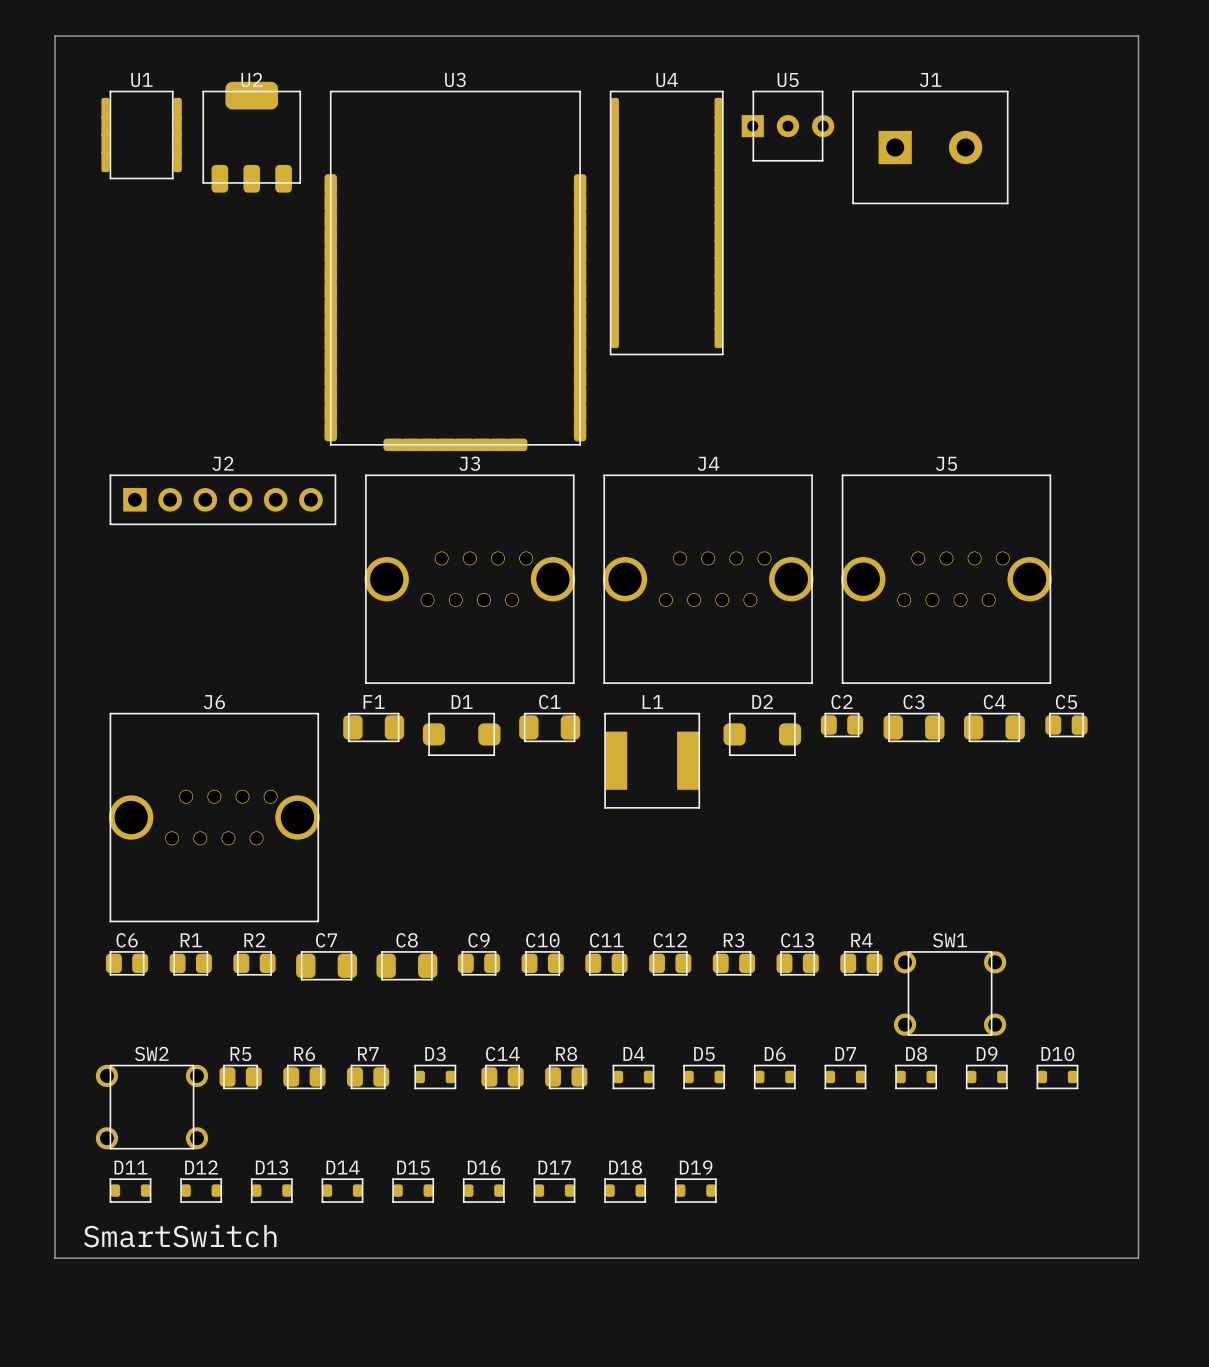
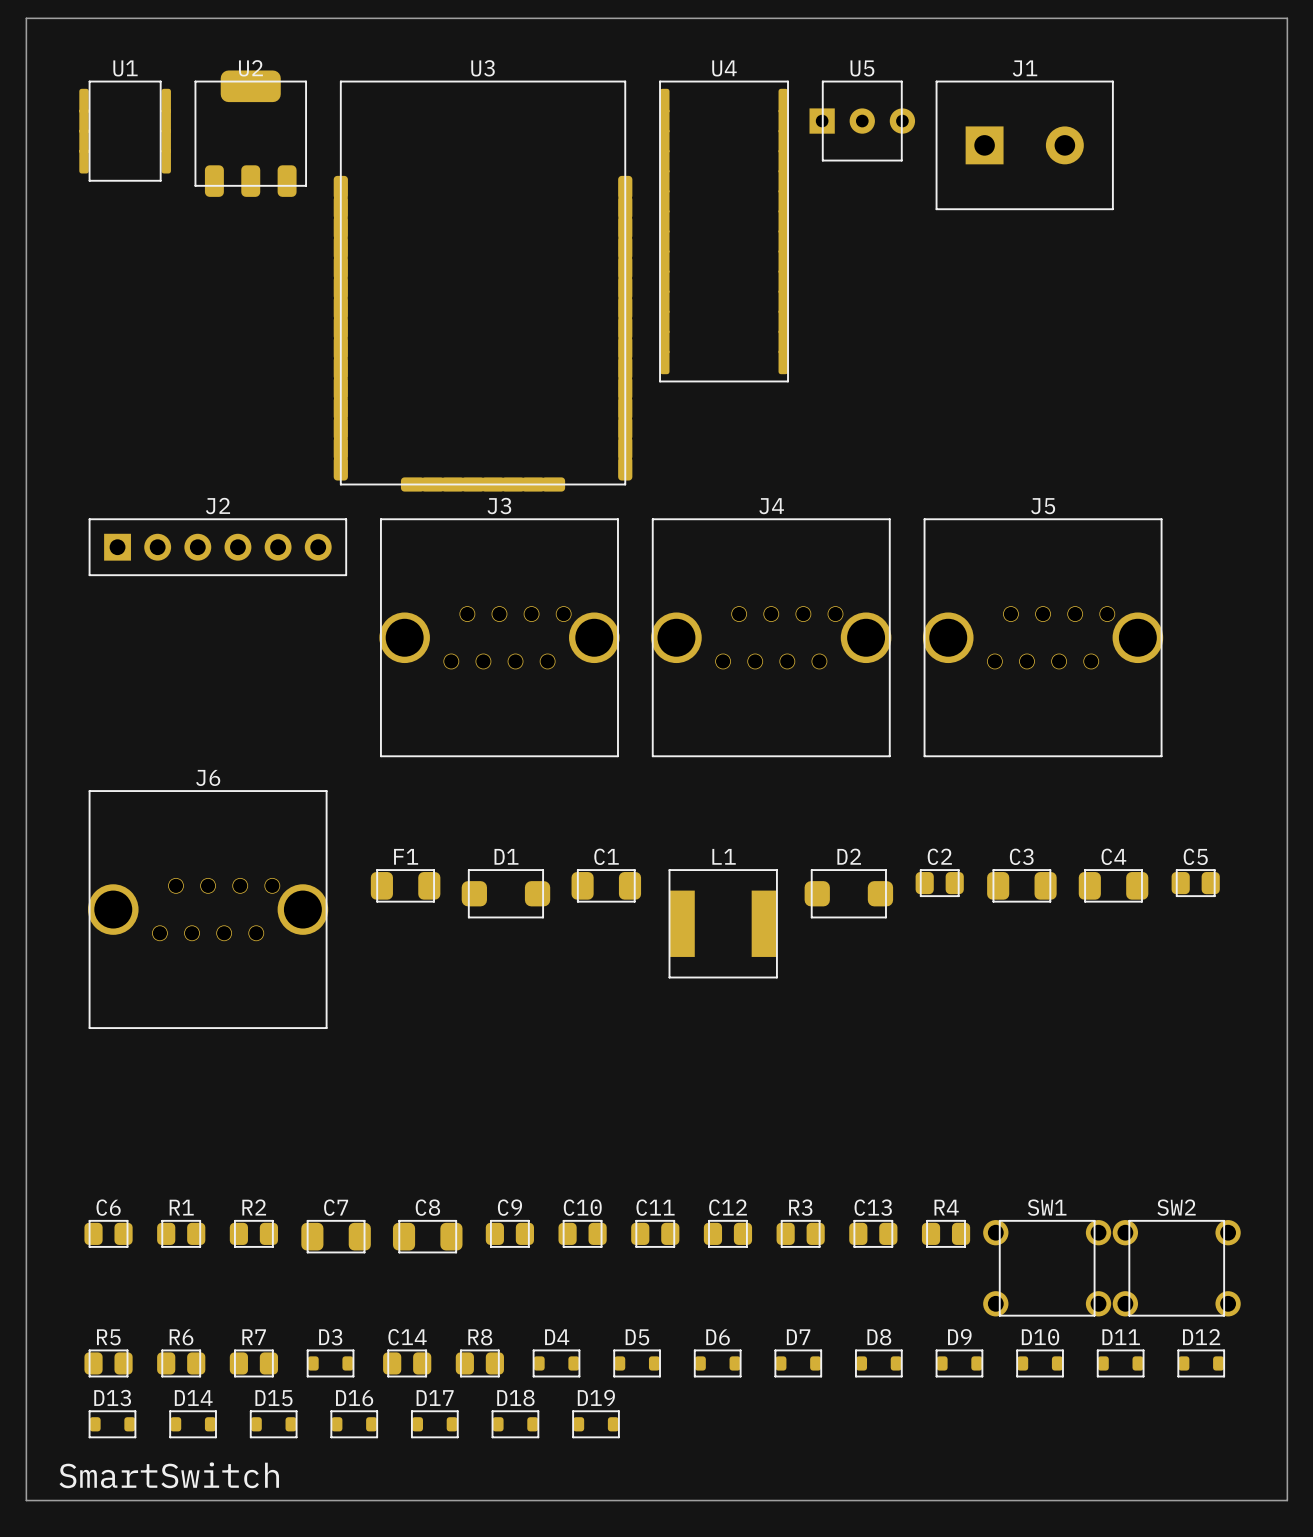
board edge: (1138, 36) (1138, 1258) (54, 1258) -> (1262, 18) (1287, 18) (1287, 1500) (26, 1500) (26, 1412)
C2 position: (841, 725) -> (939, 883)
C5 position: (1066, 725) -> (1195, 883)
F1 position: (373, 727) -> (405, 885)
C1 position: (549, 727) -> (606, 885)
C3 position: (914, 727) -> (1021, 885)
C4 position: (994, 727) -> (1113, 885)
D1 position: (461, 734) -> (505, 893)
D2 position: (762, 734) -> (848, 893)
L1 position: (652, 760) -> (723, 923)
C6 position: (127, 963) -> (108, 1233)
R1 position: (190, 963) -> (181, 1233)
R2 position: (254, 963) -> (253, 1233)
C9 position: (478, 963) -> (509, 1233)
C10 position: (542, 963) -> (582, 1233)
C11 position: (606, 963) -> (655, 1233)
C12 position: (670, 963) -> (727, 1233)
R3 position: (733, 963) -> (800, 1233)
C13 position: (797, 963) -> (873, 1233)
R4 position: (861, 963) -> (946, 1233)
C7 position: (326, 965) -> (336, 1236)
C8 position: (406, 965) -> (427, 1236)
SW1 position: (950, 993) -> (1047, 1268)
R5 position: (240, 1076) -> (108, 1363)
R6 position: (304, 1076) -> (181, 1363)
R7 position: (368, 1076) -> (253, 1363)
D3 position: (435, 1076) -> (330, 1363)
C14 position: (502, 1076) -> (407, 1363)
R8 position: (566, 1076) -> (479, 1363)
D4 position: (633, 1076) -> (556, 1363)
D5 position: (704, 1076) -> (637, 1363)
D6 position: (774, 1076) -> (717, 1363)
D7 position: (845, 1076) -> (798, 1363)
D8 position: (916, 1076) -> (878, 1363)
D9 position: (986, 1076) -> (959, 1363)
D10 position: (1057, 1076) -> (1040, 1363)
SW2 position: (151, 1107) -> (1176, 1268)
D11 position: (130, 1190) -> (1120, 1363)
D12 position: (201, 1190) -> (1201, 1363)
D13 position: (271, 1190) -> (112, 1424)
D14 position: (342, 1190) -> (193, 1424)
D15 position: (413, 1190) -> (273, 1424)
D16 position: (483, 1190) -> (354, 1424)
D17 position: (554, 1190) -> (434, 1424)
D18 position: (625, 1190) -> (515, 1424)
D19 position: (695, 1190) -> (596, 1424)
text position: SmartSwitch (180, 1236) -> SmartSwitch (169, 1475)

